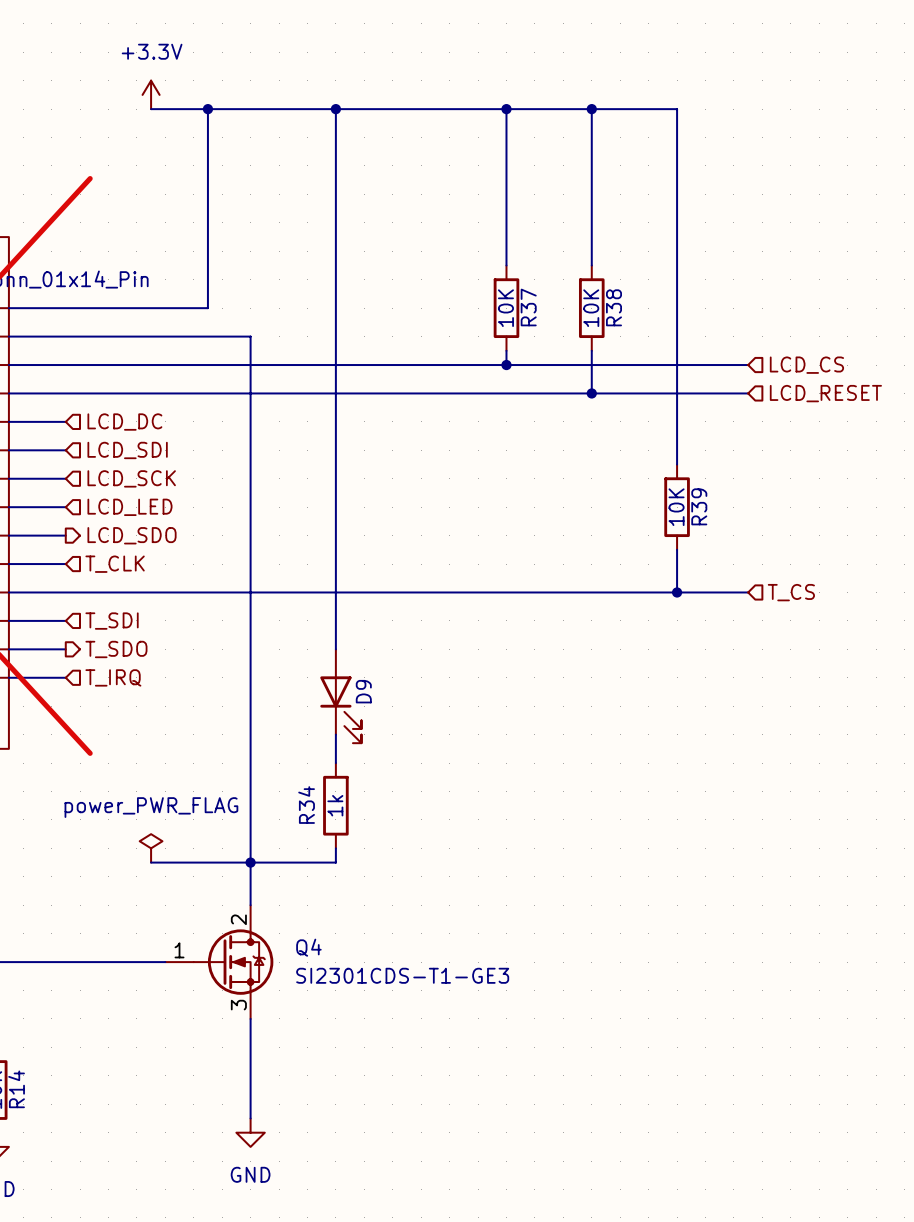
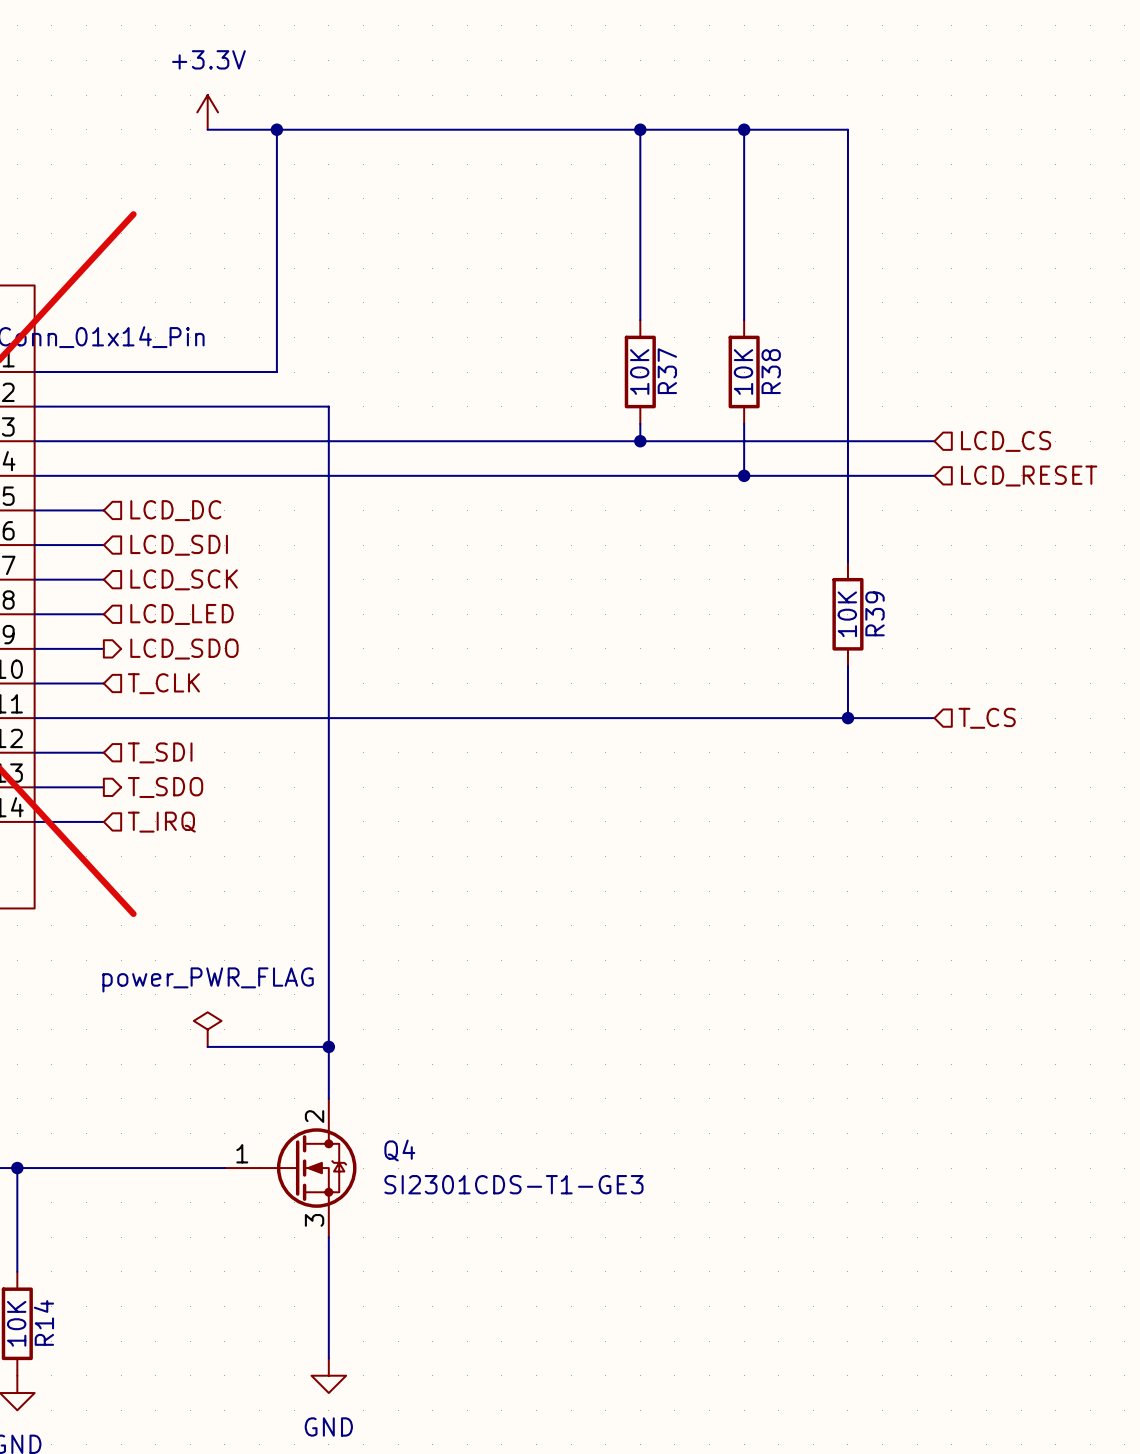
wire: (335, 109) (335, 649) -> none
junction: (335, 109) -> none
D9: (340, 696) -> none
wire: (335, 734) (335, 763) -> none
R34: 1k (335, 805) -> none
wire: (335, 848) (335, 862) (250, 862) -> none

